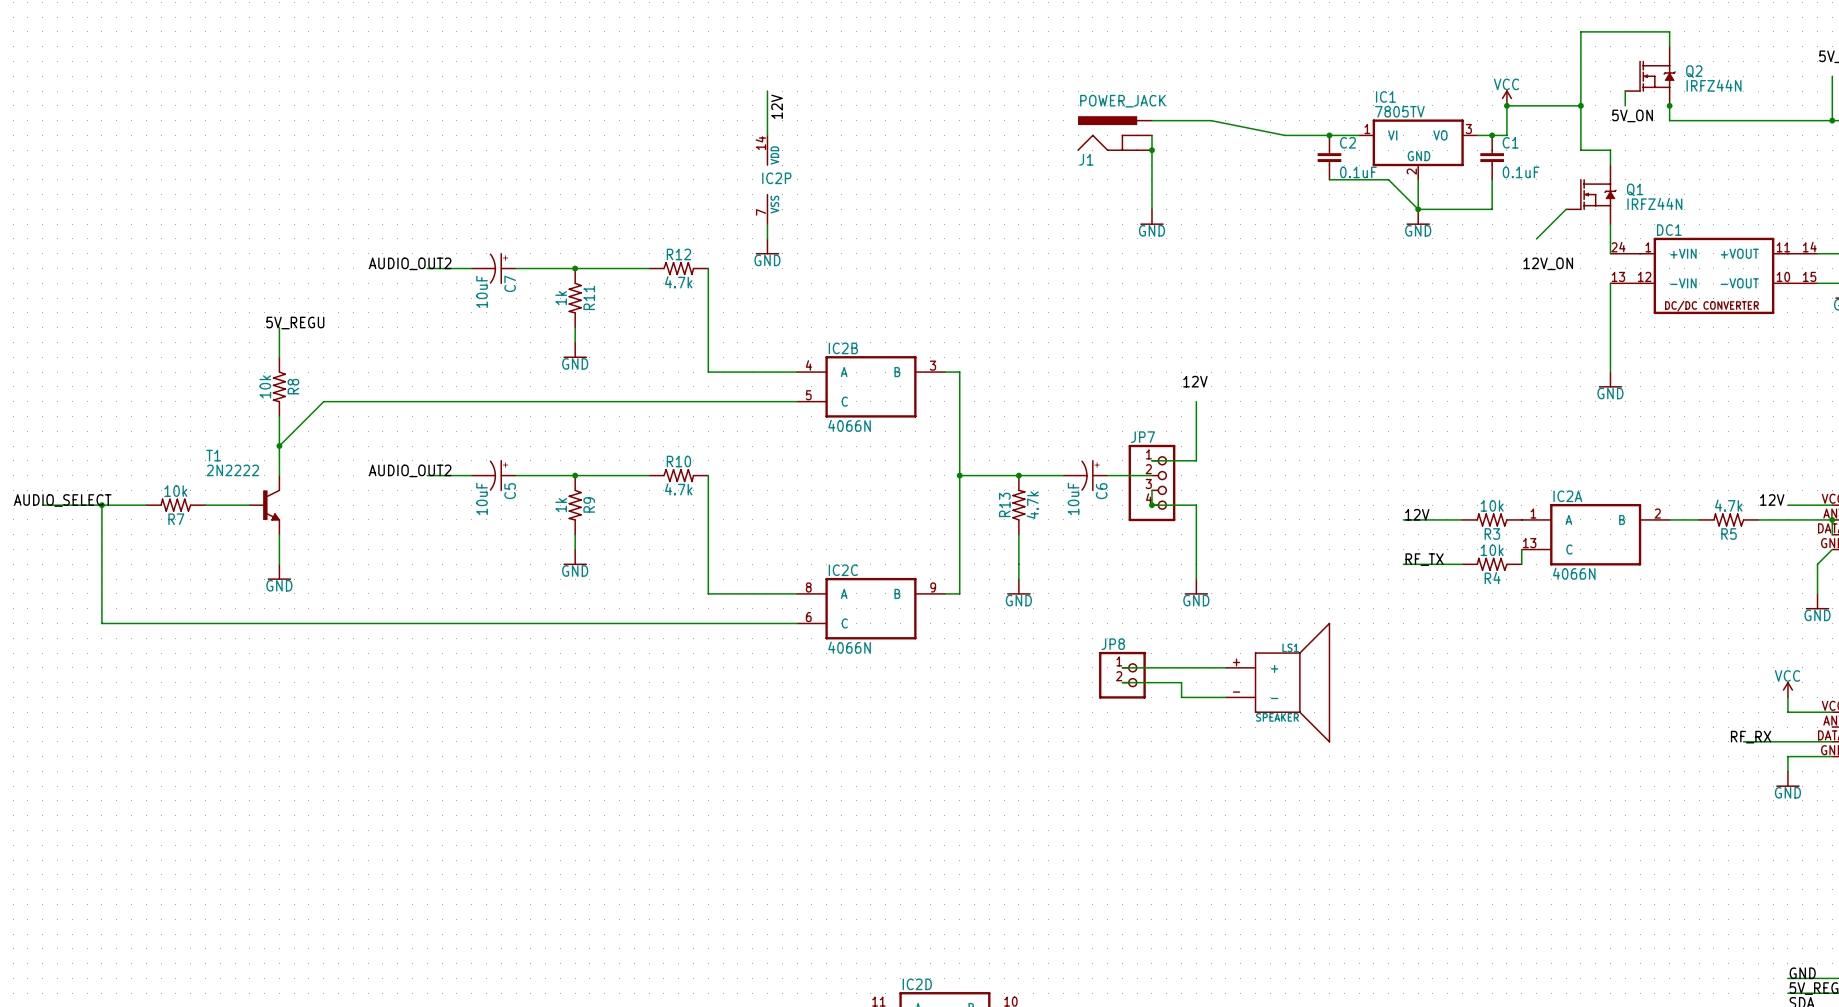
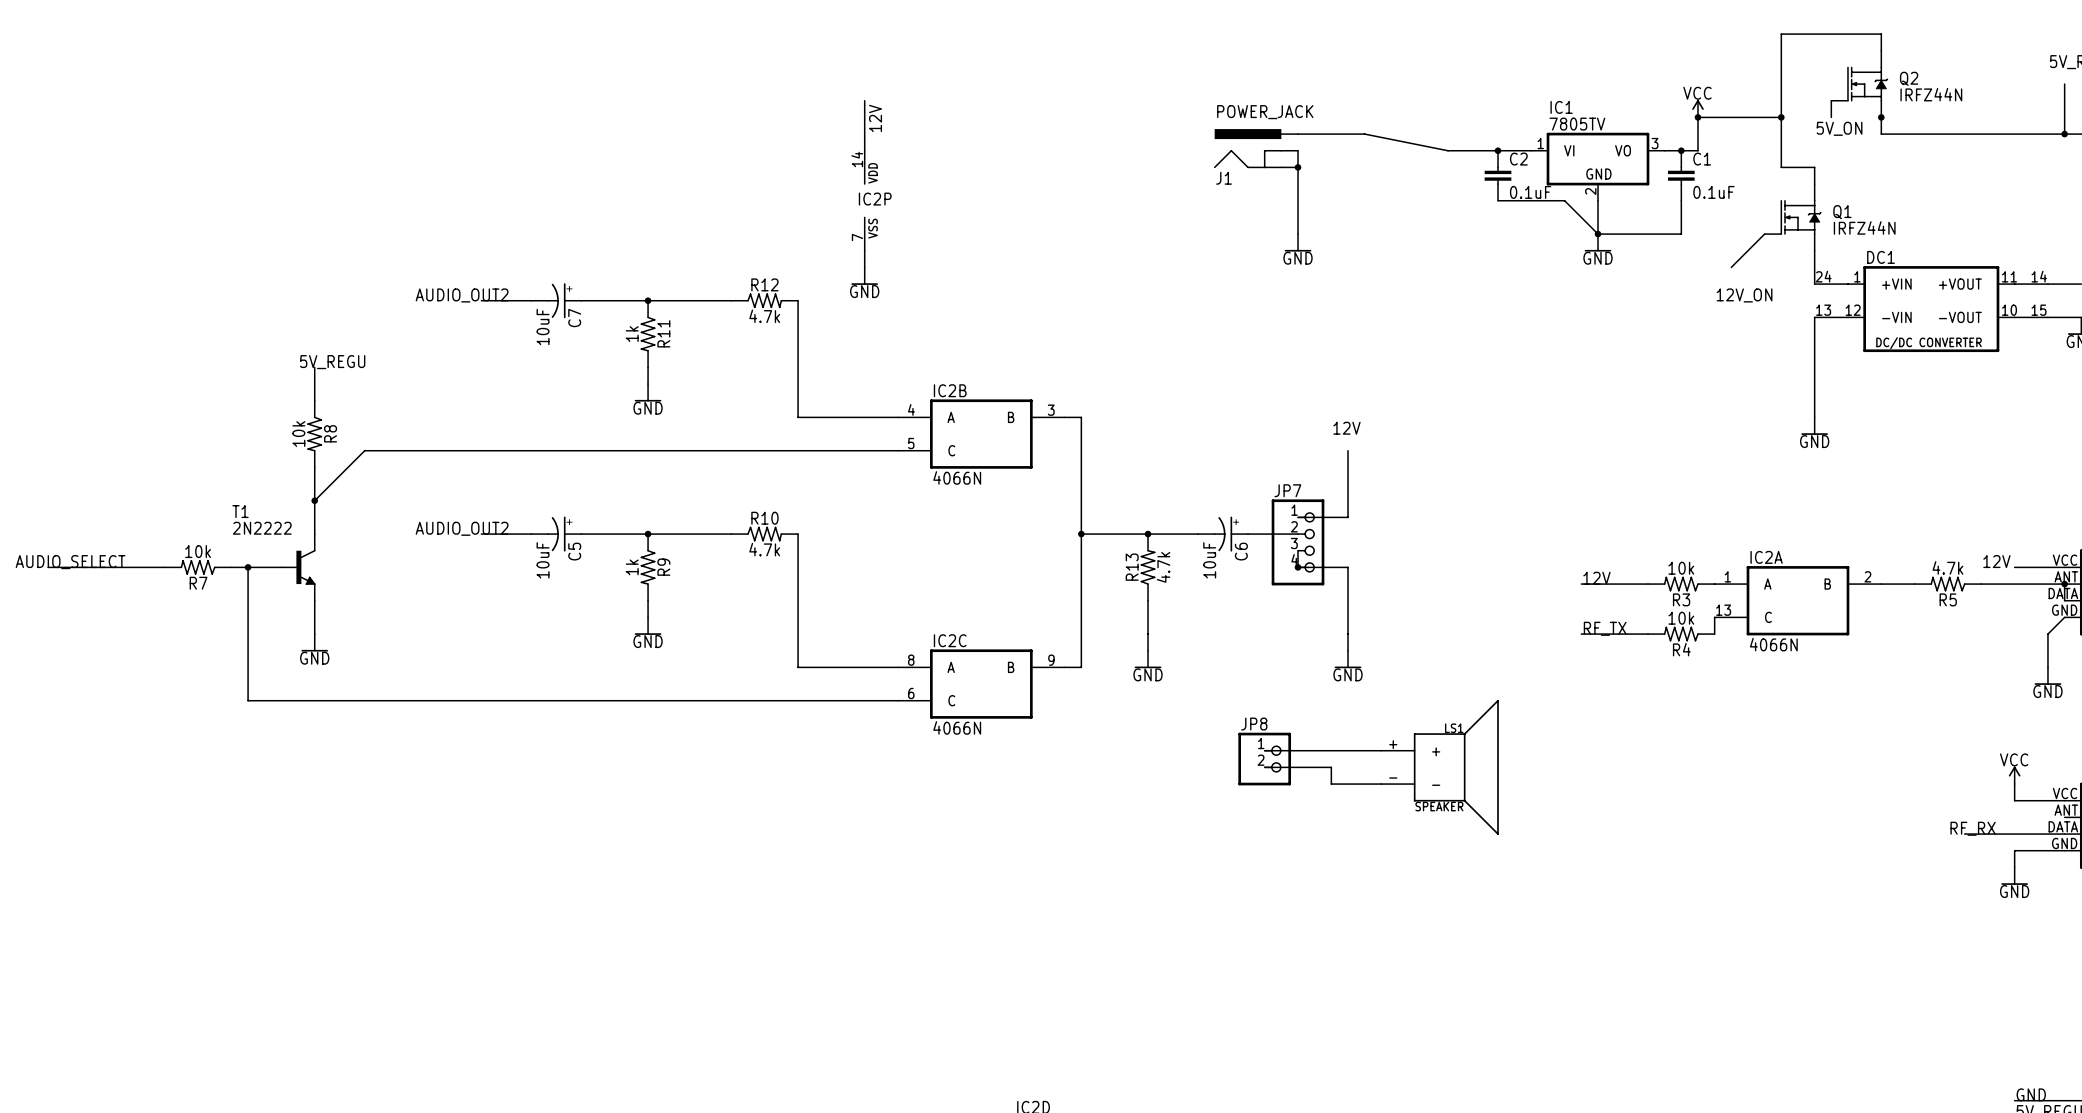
wire: (101, 505) (101, 623) (220, 623) -> (248, 567) (248, 700)
junction: (101, 505) -> none
junction: none -> (248, 567)

